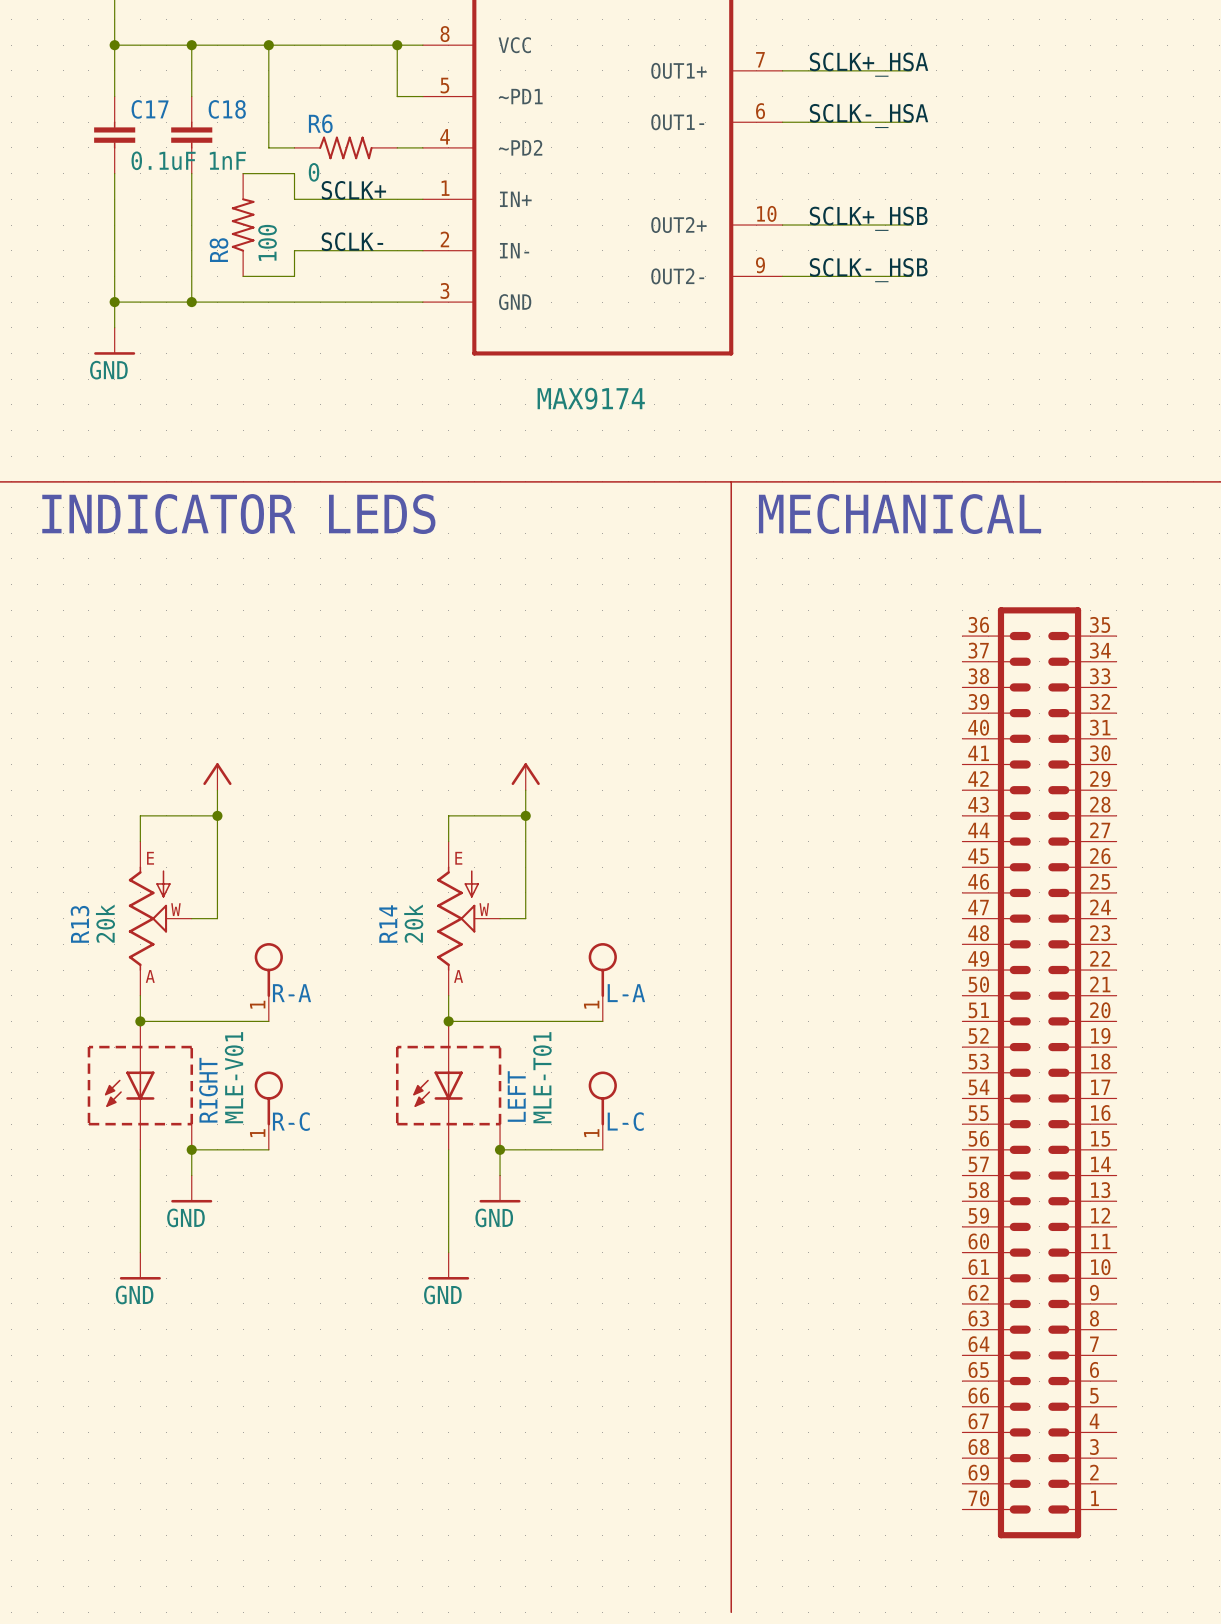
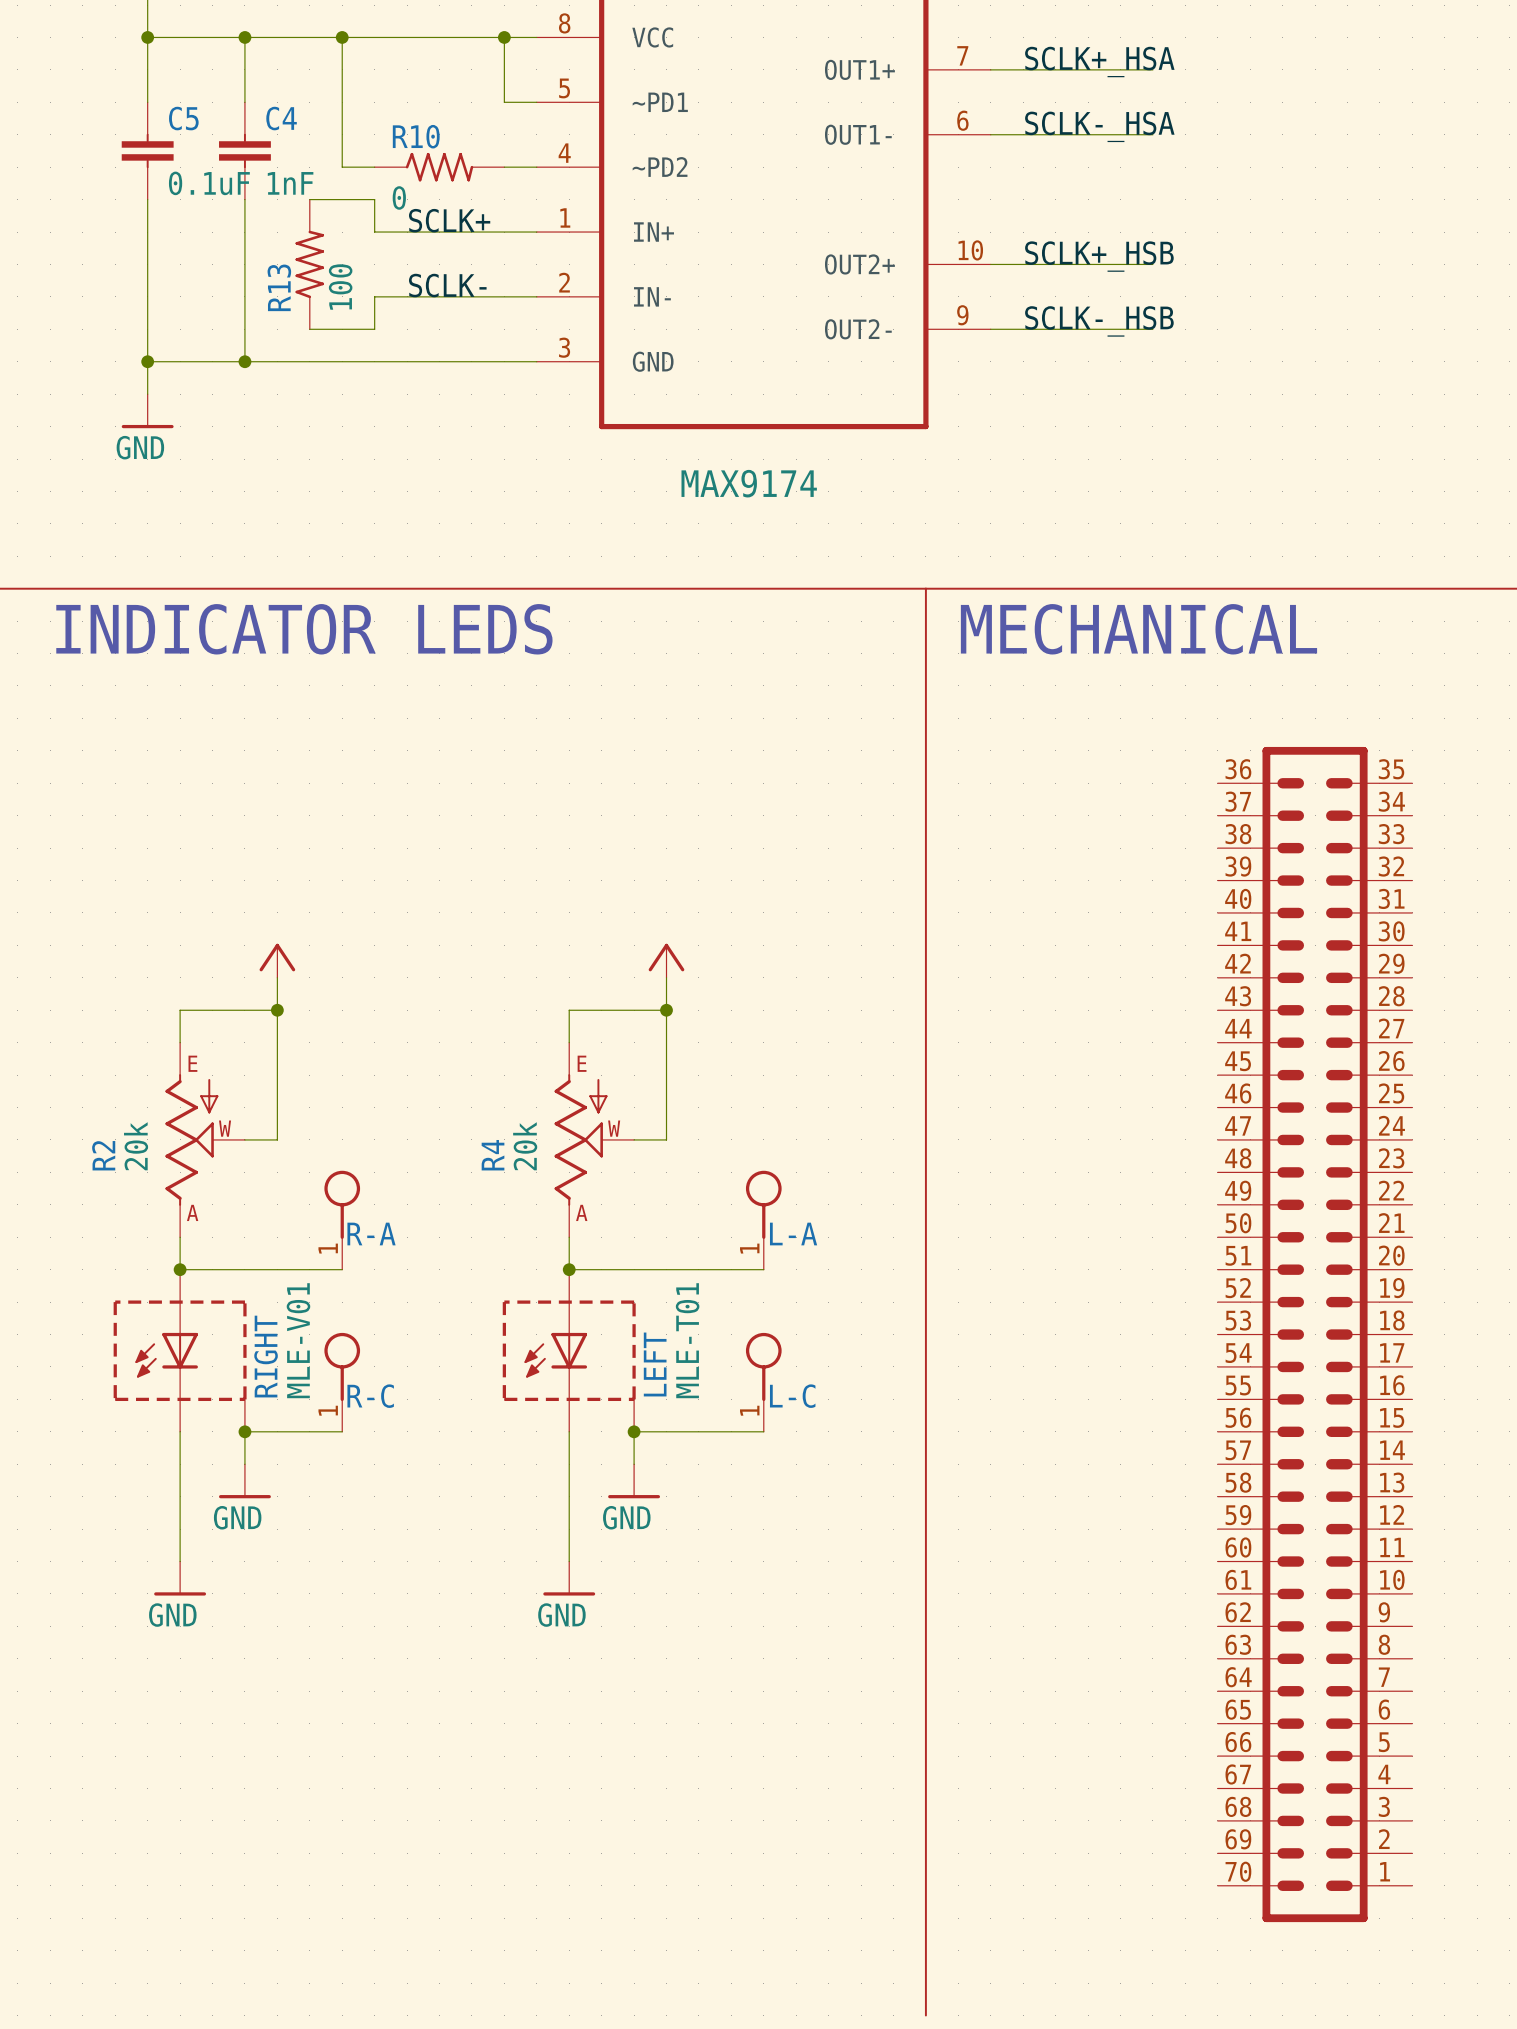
C17 name: C17 (150, 109) -> C5 (183, 118)
C18 name: C18 (227, 109) -> C4 (281, 118)
R6 name: R6 (320, 123) -> R10 (416, 136)
R8 name: R8 (218, 250) -> R13 (279, 287)
R13 name: R13 (80, 924) -> R2 (103, 1155)
R14 name: R14 (388, 924) -> R4 (493, 1155)

